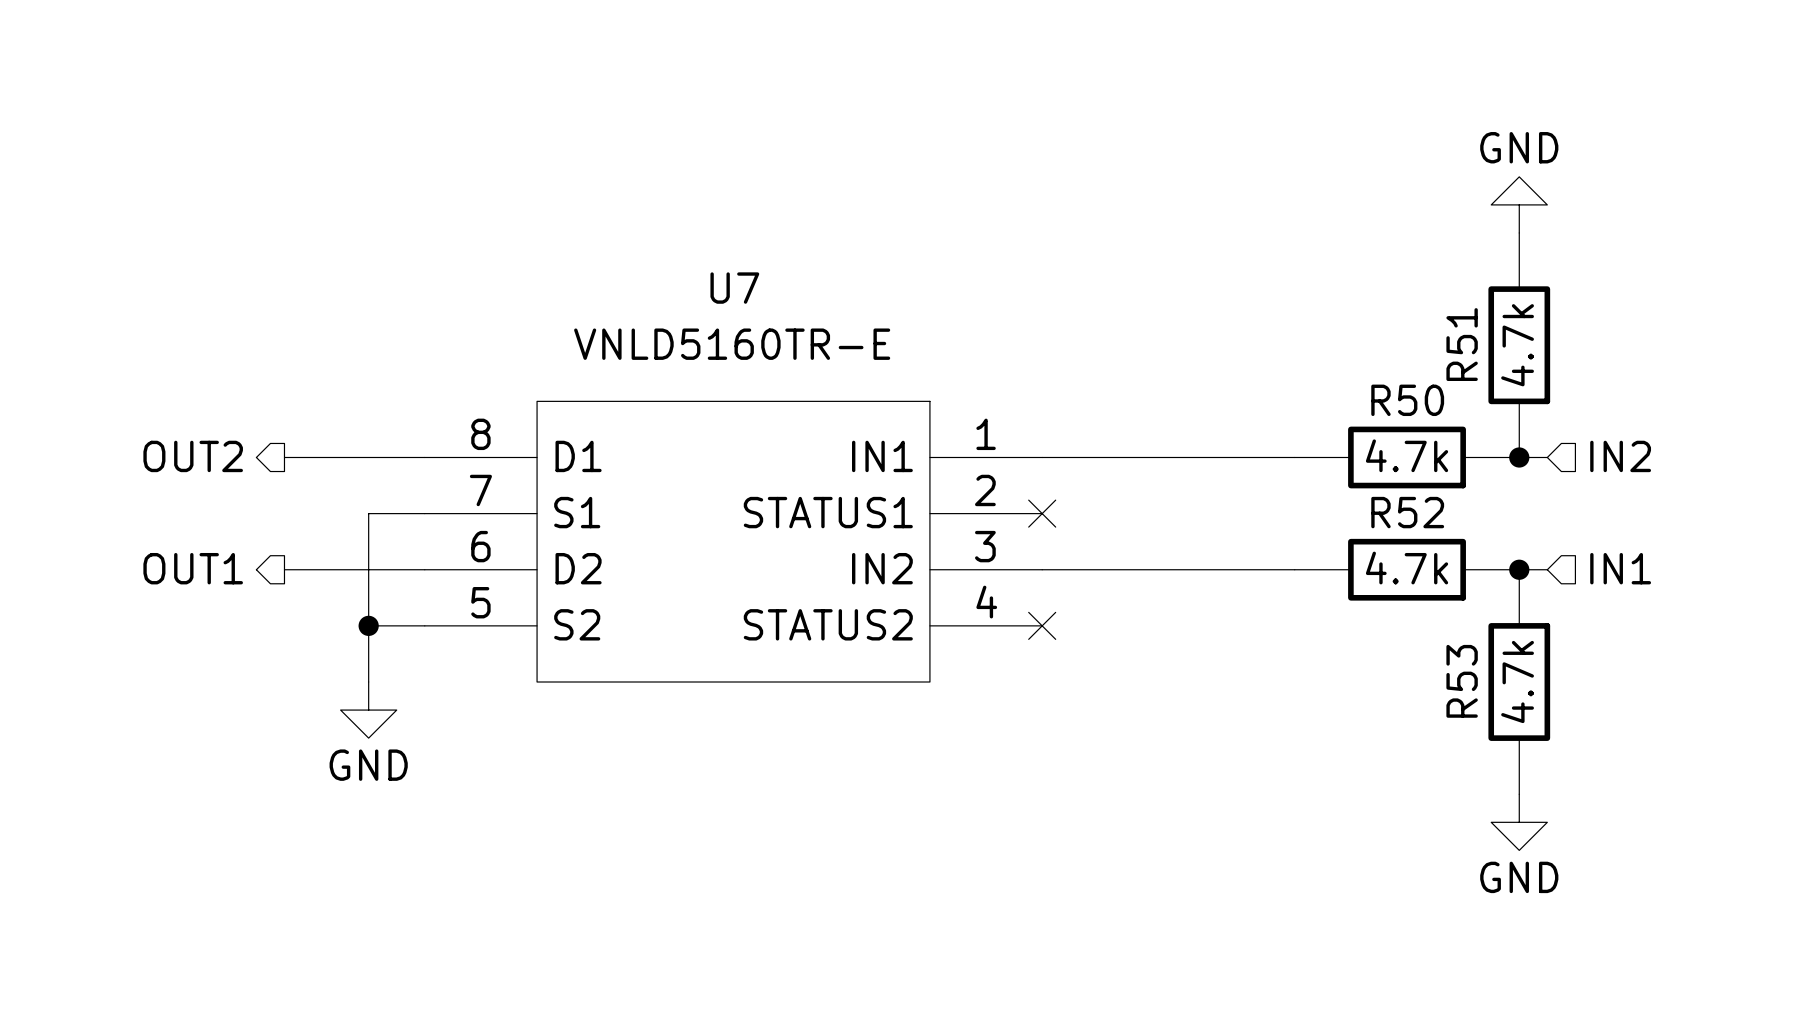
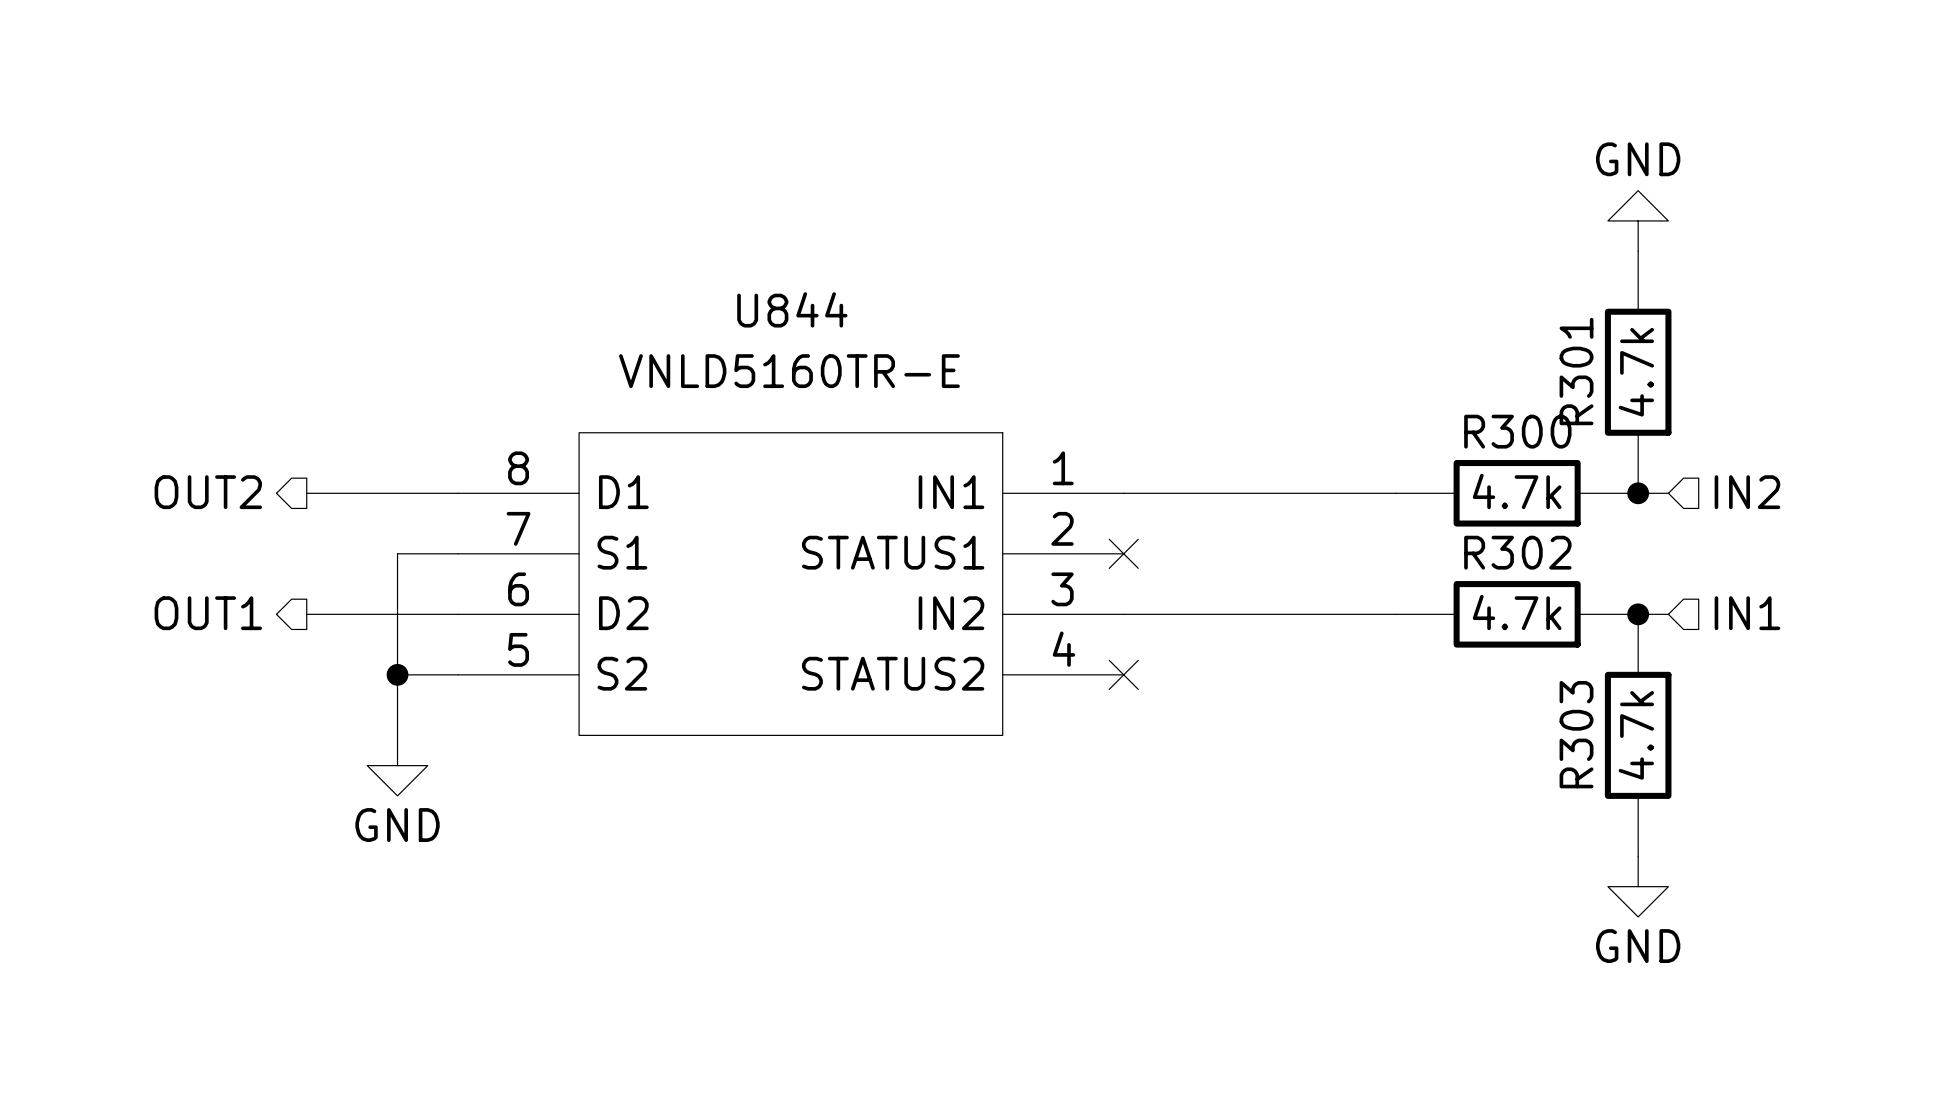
U7 name: U7 (734, 288) -> U844 (792, 309)
R51 name: R51 (1462, 344) -> R301 (1576, 371)
R50 name: R50 (1407, 400) -> R300 (1517, 431)
R52 name: R52 (1407, 512) -> R302 (1517, 552)
R53 name: R53 (1462, 681) -> R303 (1576, 734)

